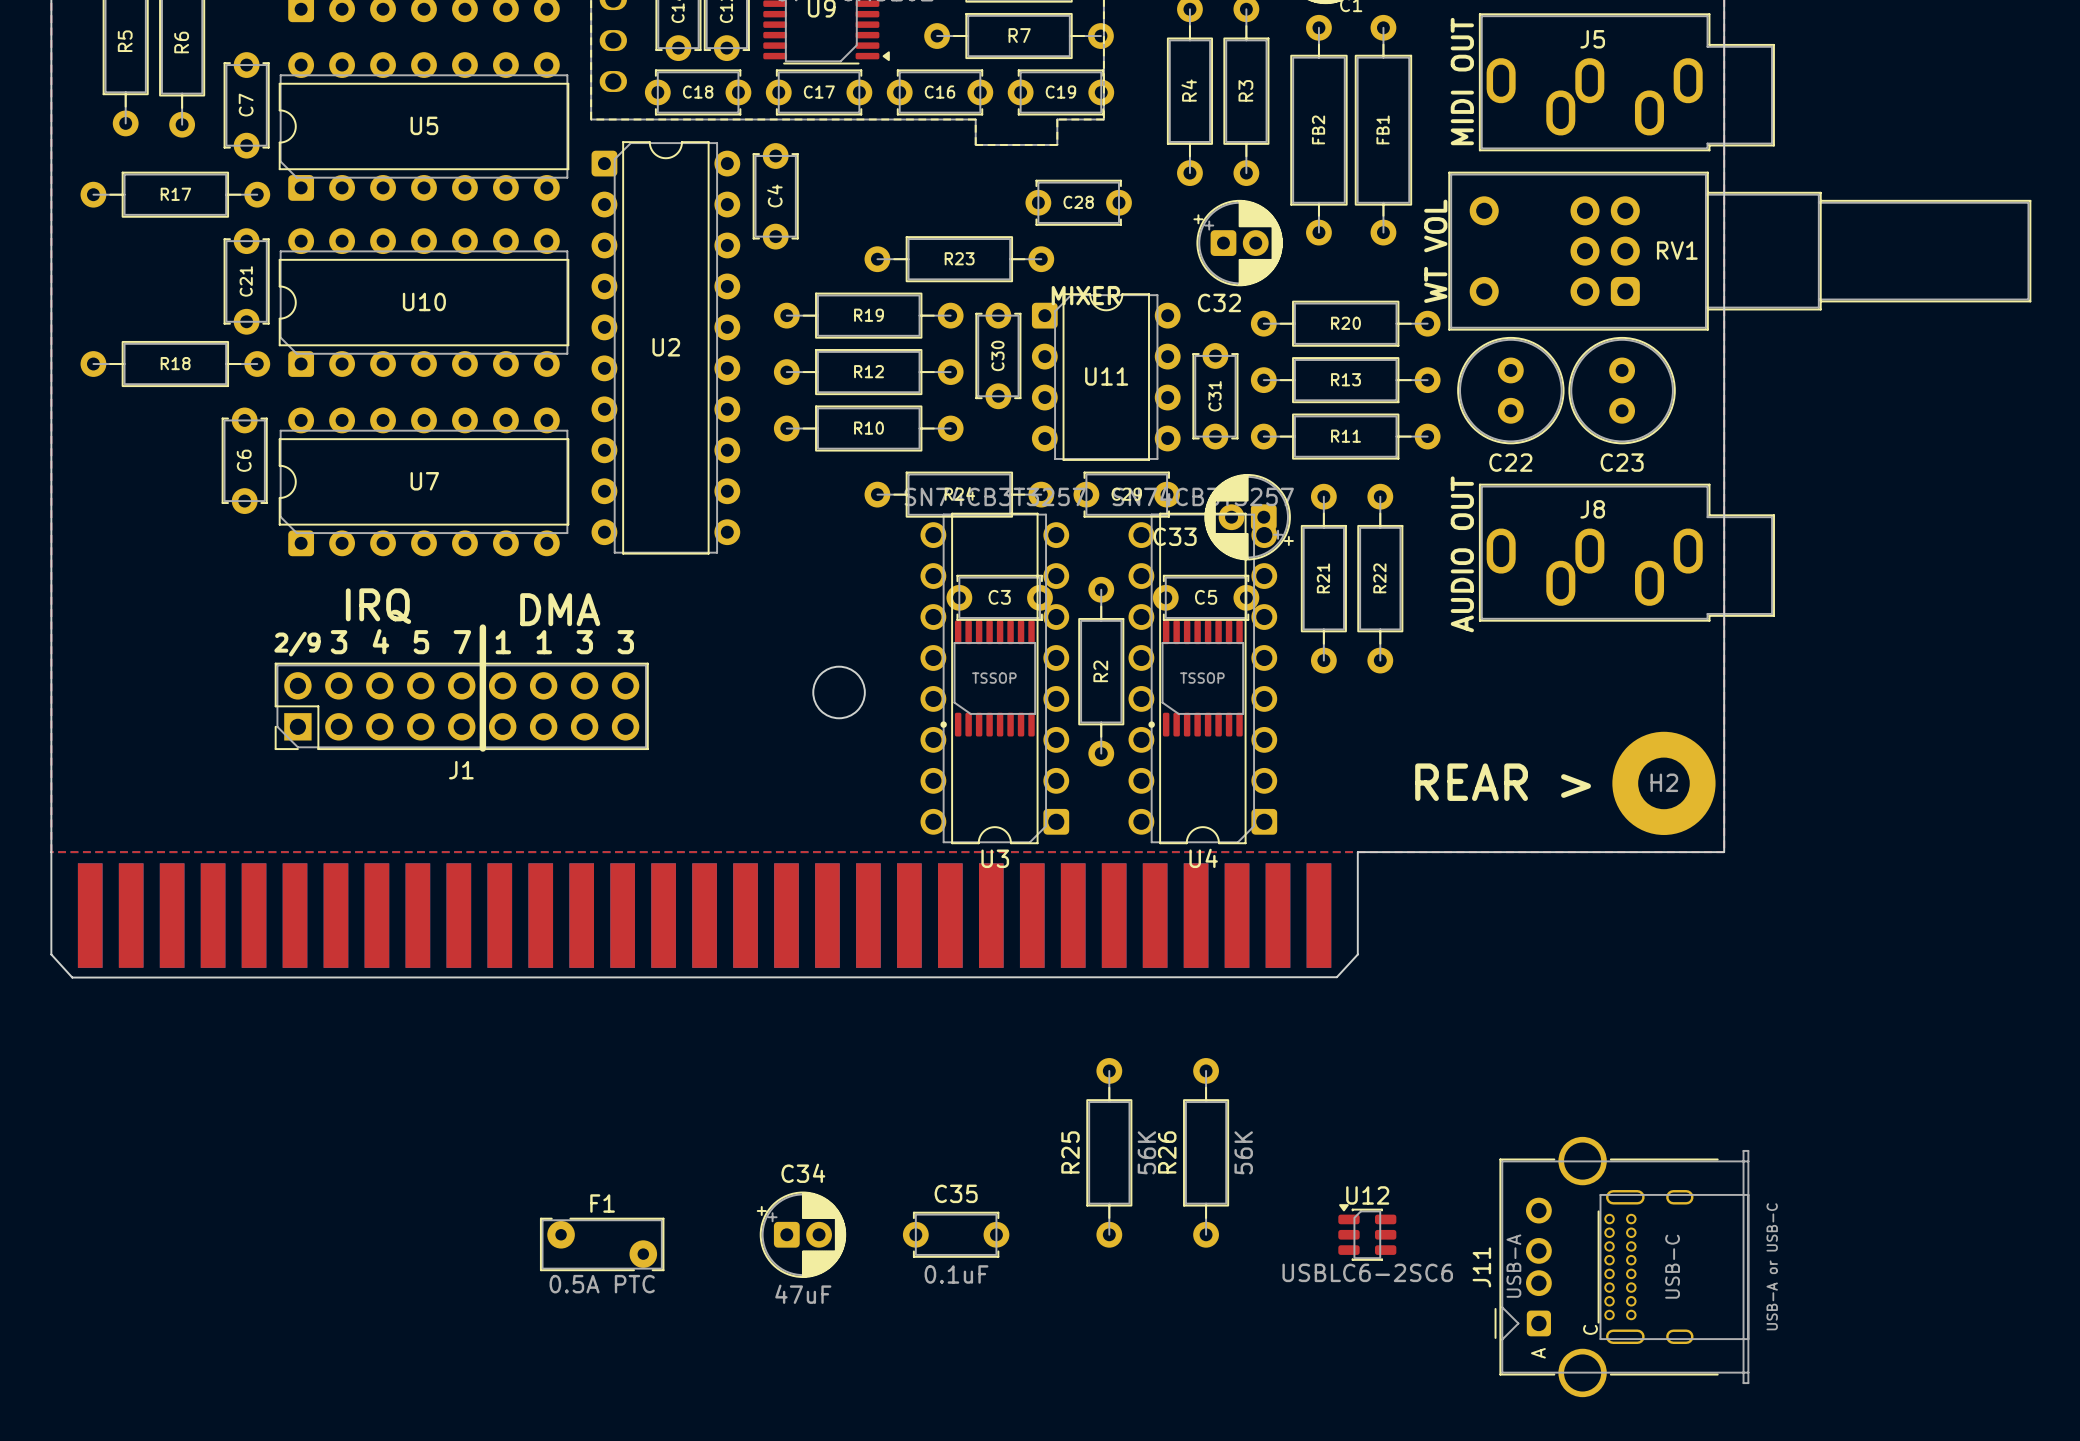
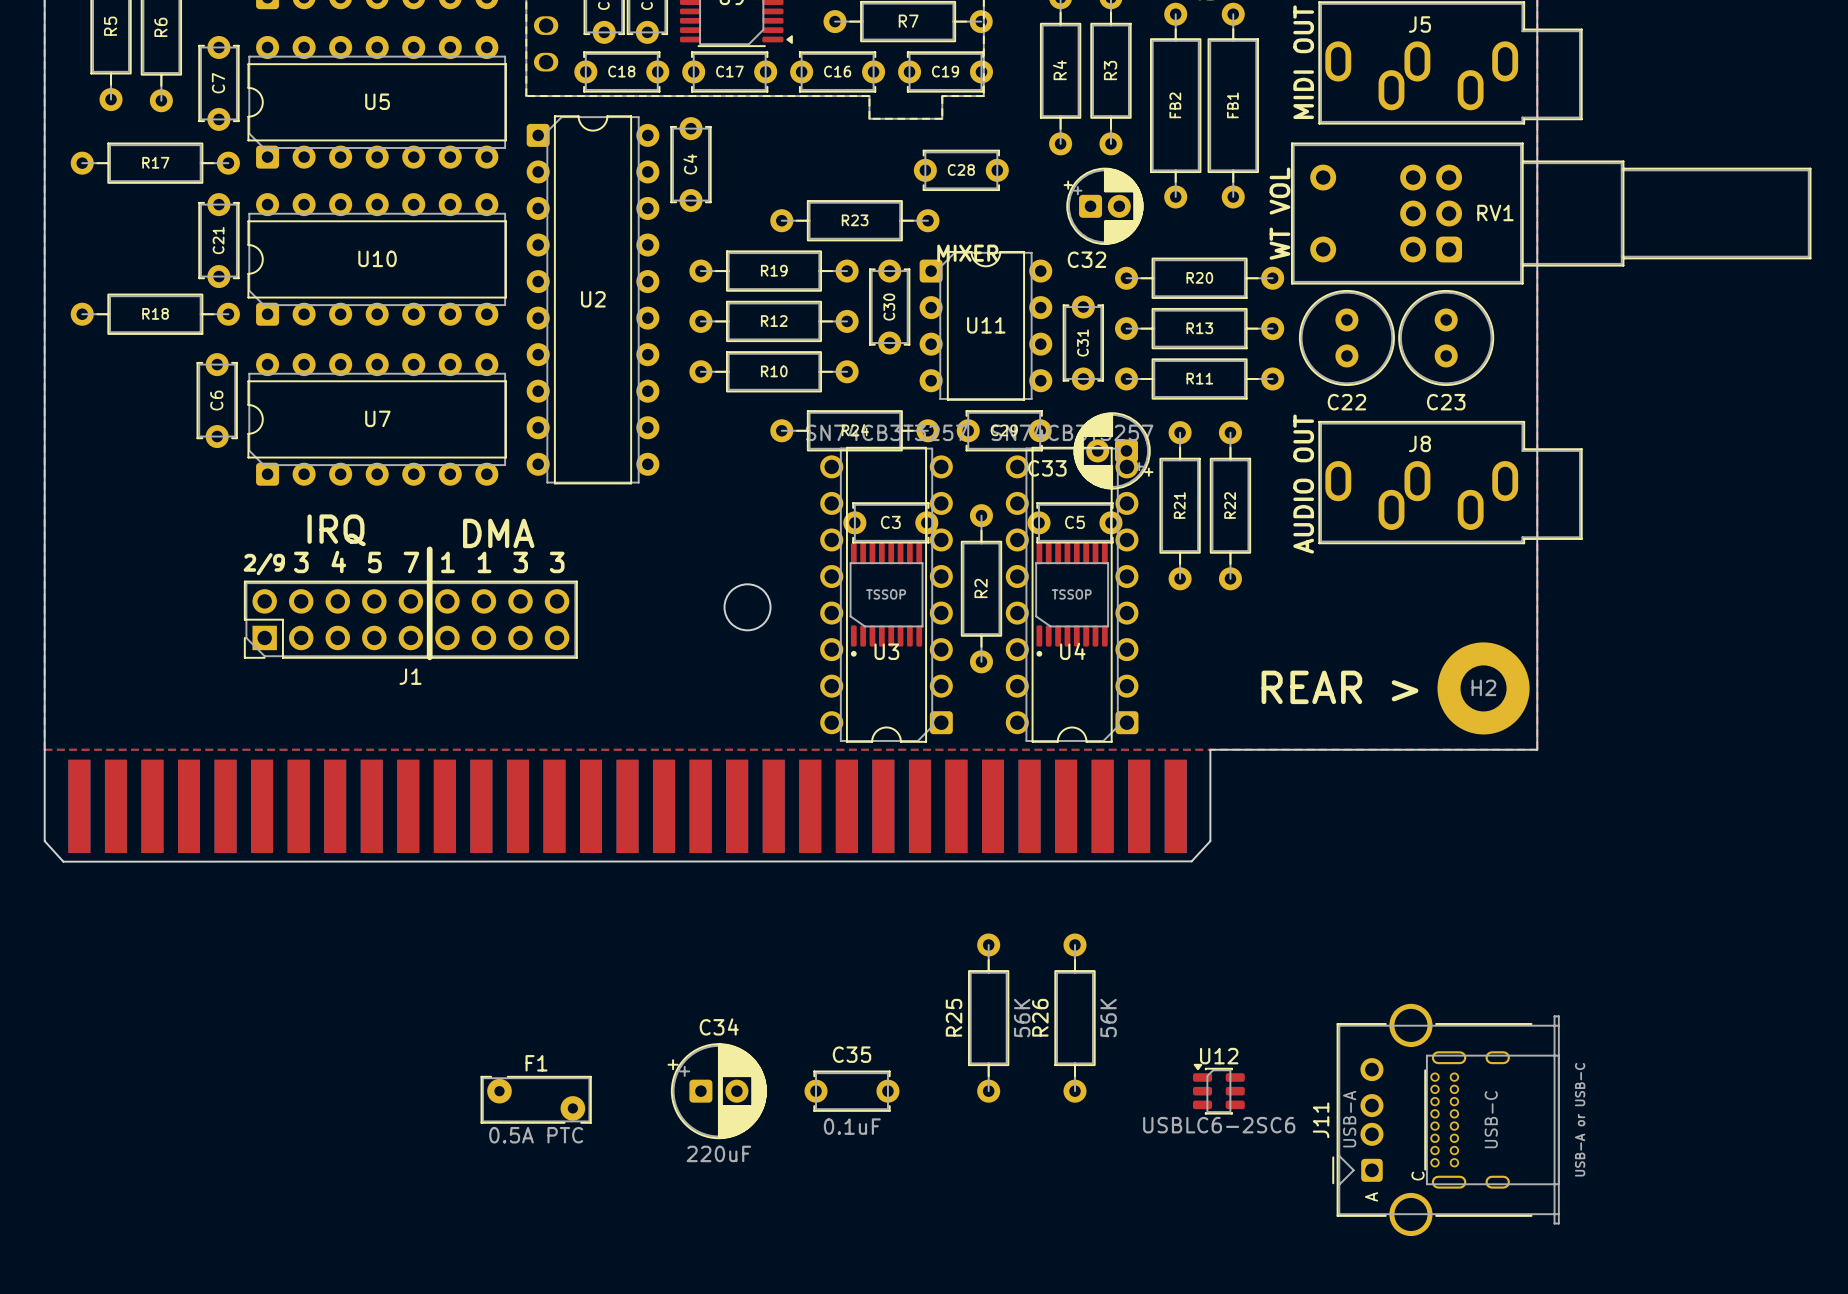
U3 footprint: [920, 512, 1070, 845] -> [820, 446, 953, 743]
U4 footprint: [1128, 512, 1278, 845] -> [1005, 446, 1139, 743]
U3 name position: U3 (995, 858) -> U3 (886, 651)
U4 name position: U4 (1203, 858) -> U4 (1072, 651)
C34 footprint: [756, 1191, 847, 1278] -> [667, 1043, 767, 1140]
C34 value: 47uF (803, 1294) -> 220uF (718, 1153)

